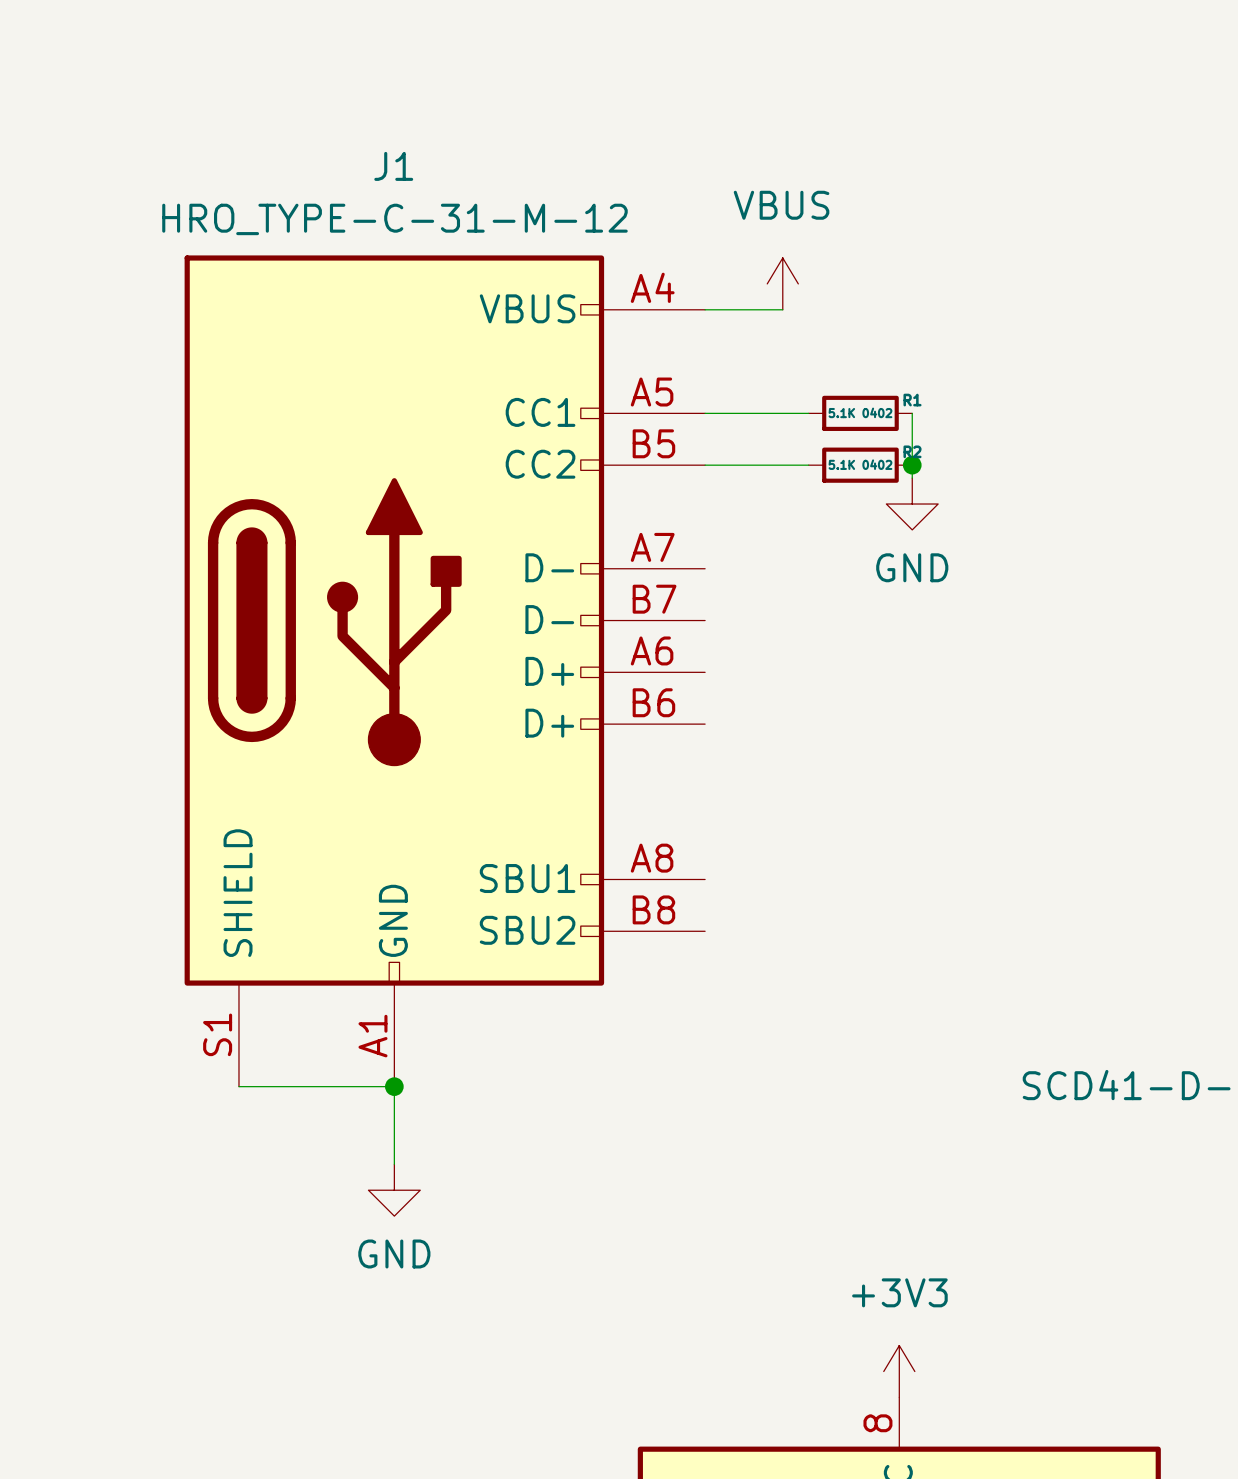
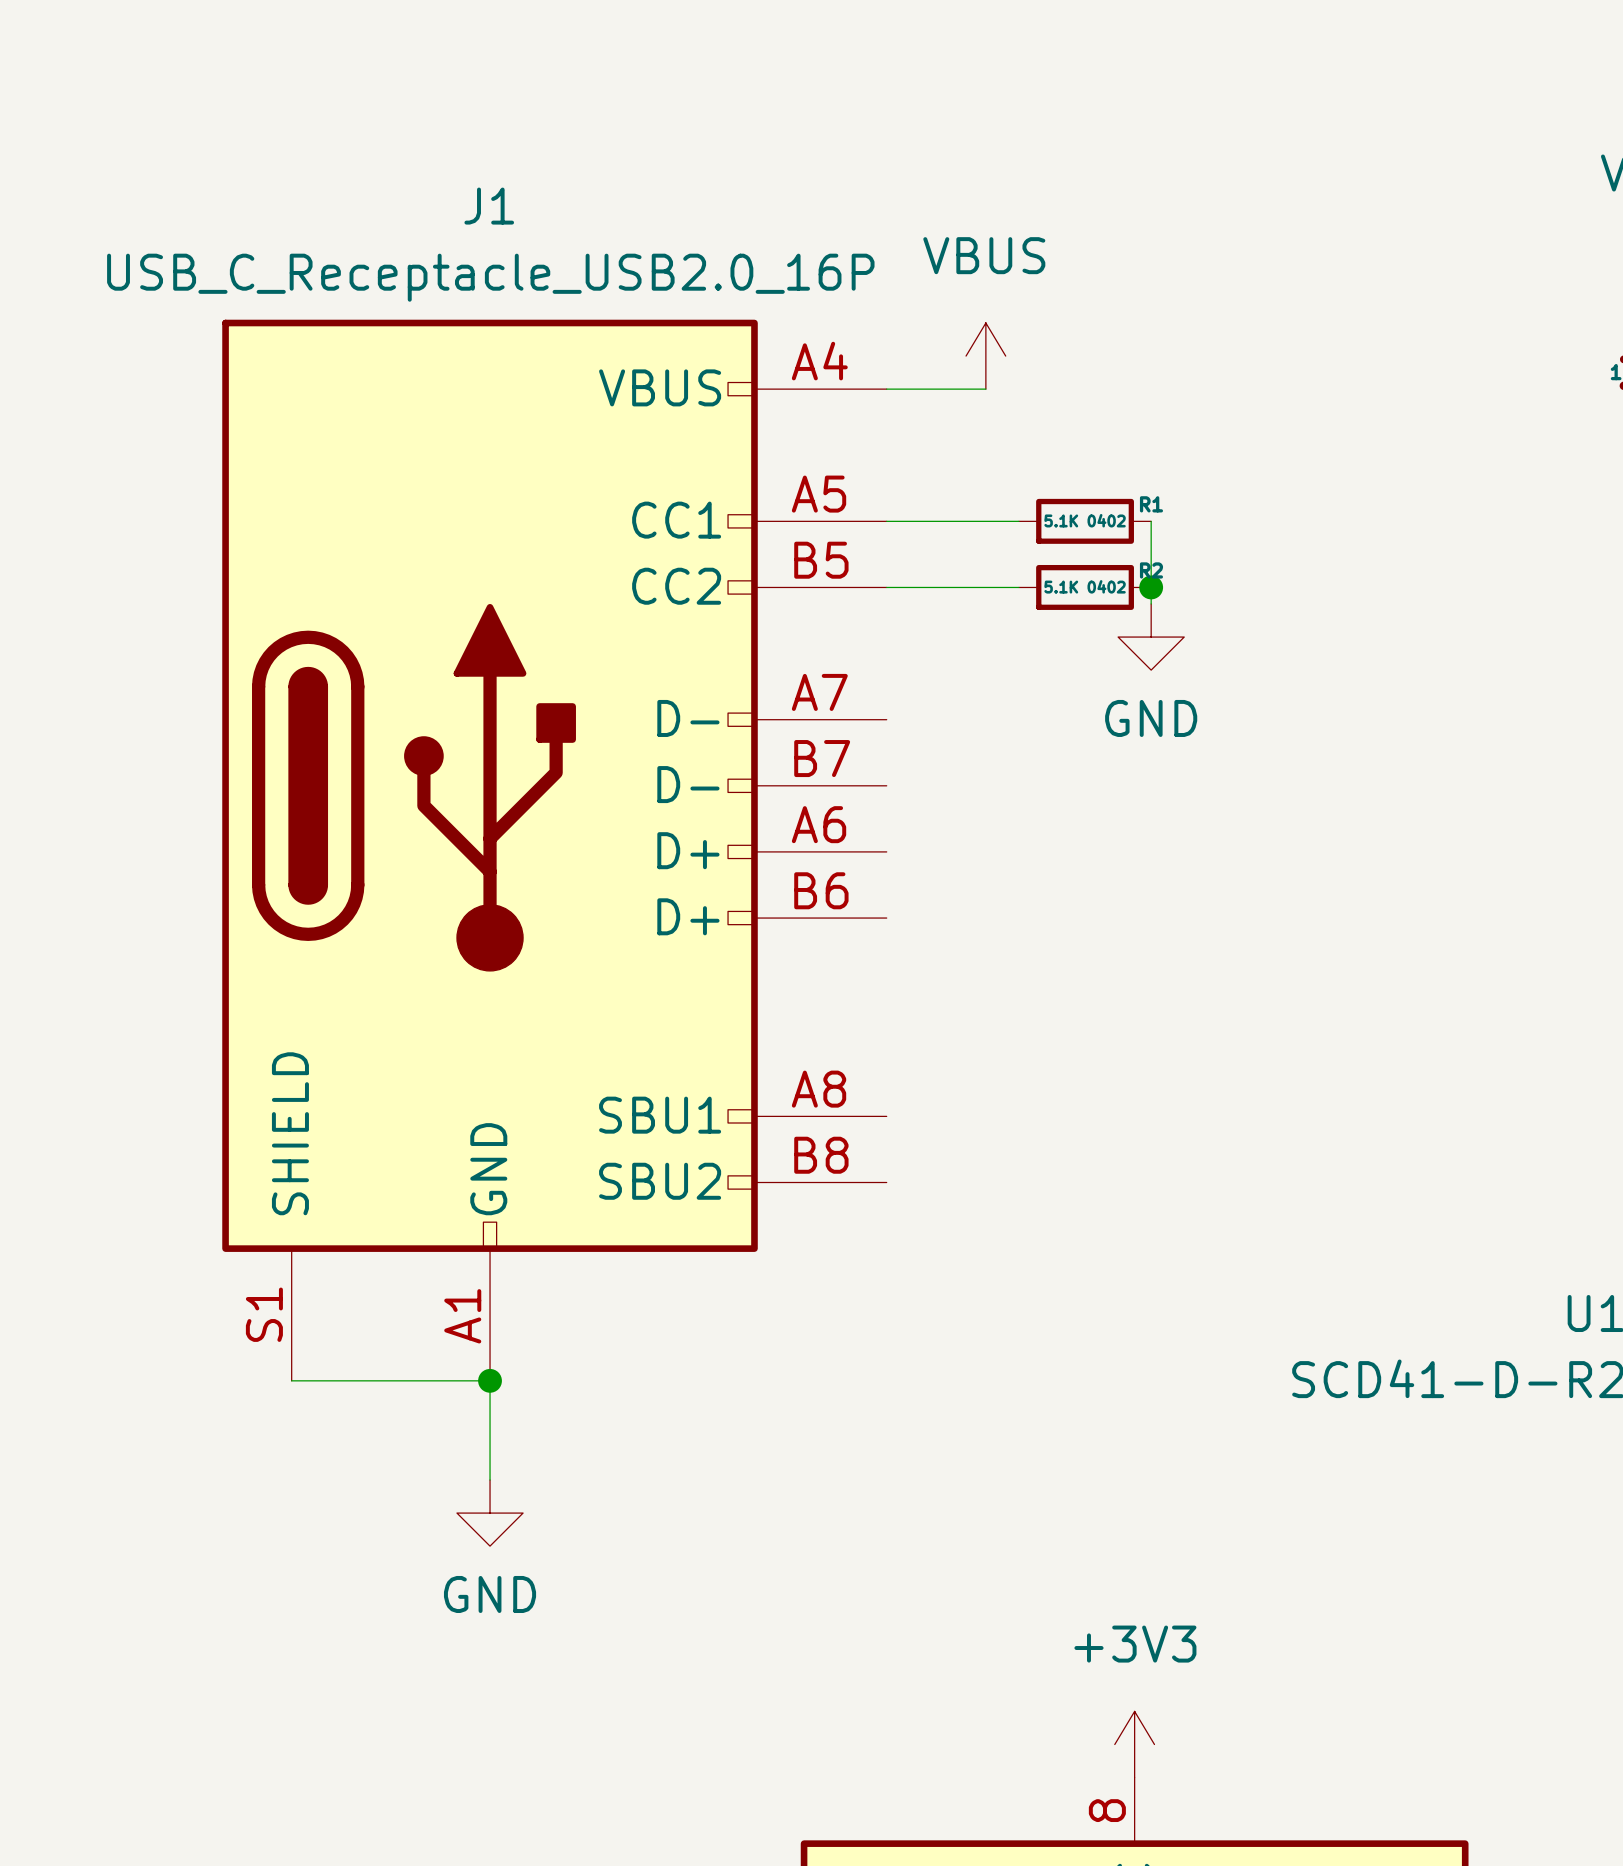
J1 value: HRO_TYPE-C-31-M-12 (394, 219) -> USB_C_Receptacle_USB2.0_16P (490, 277)

